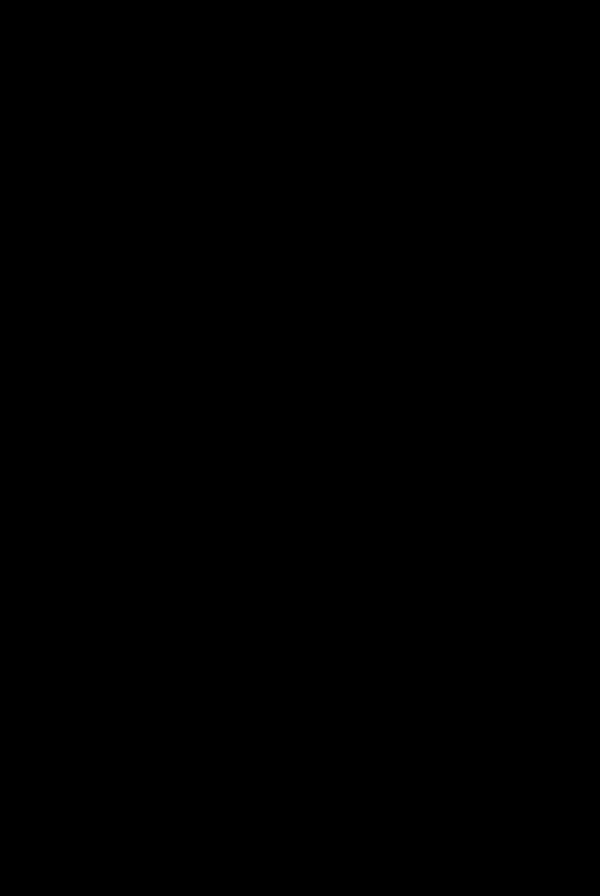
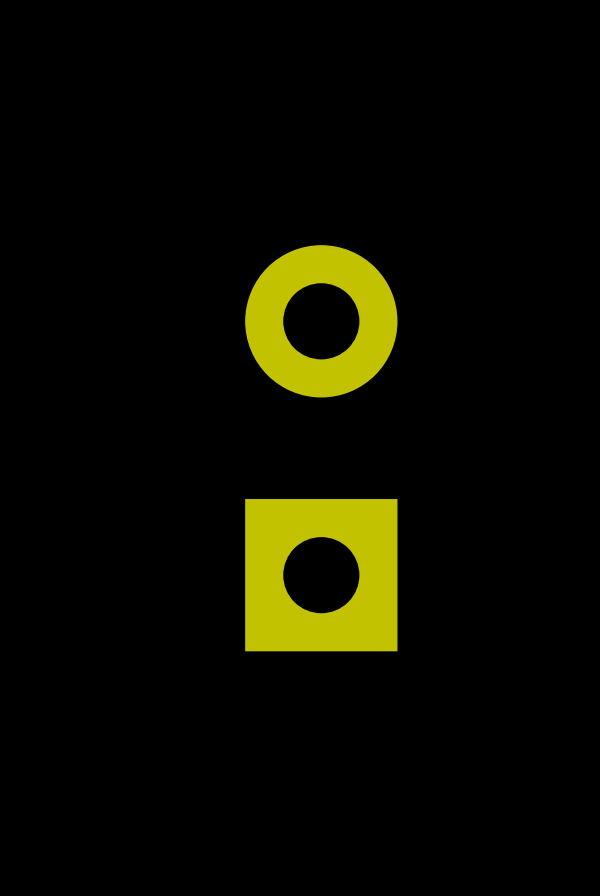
part: none -> (321, 448)

